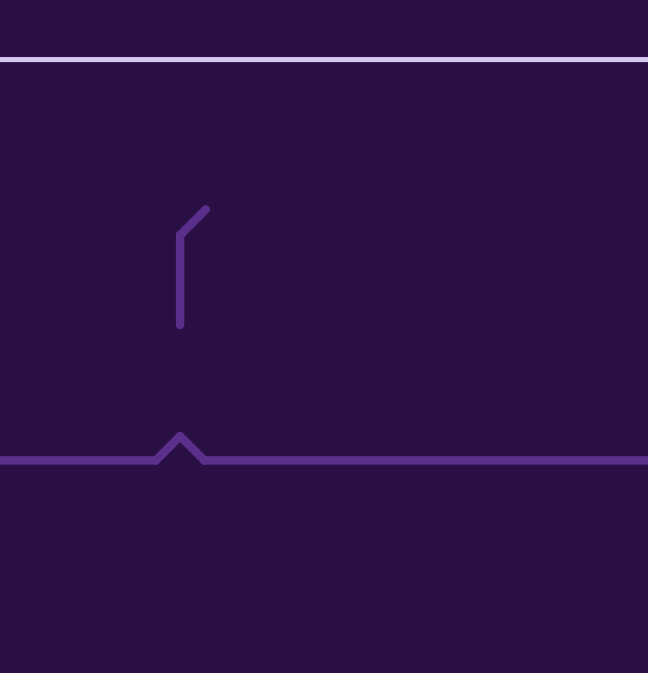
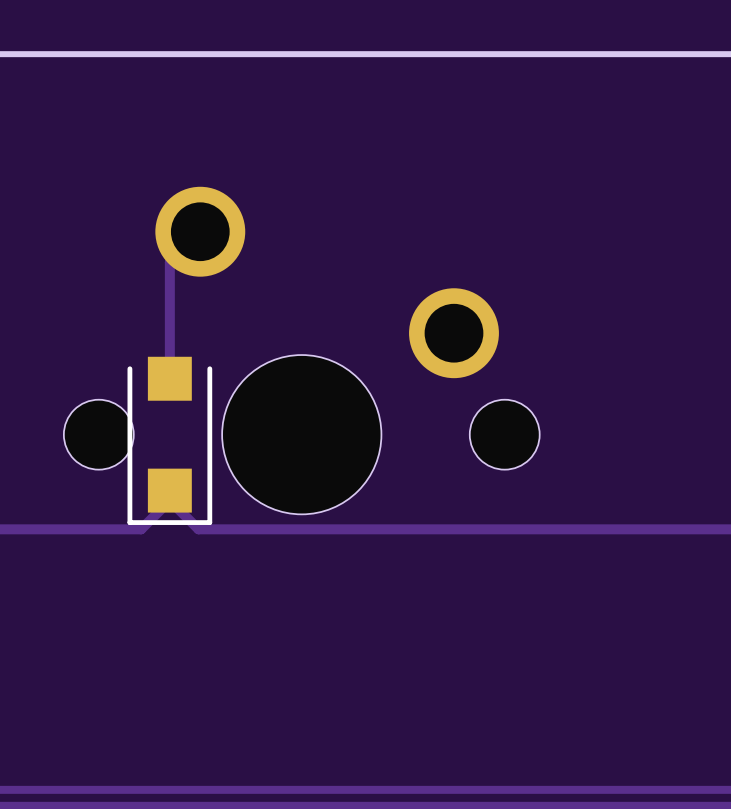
part: none -> (301, 350)
part: none -> (169, 440)

